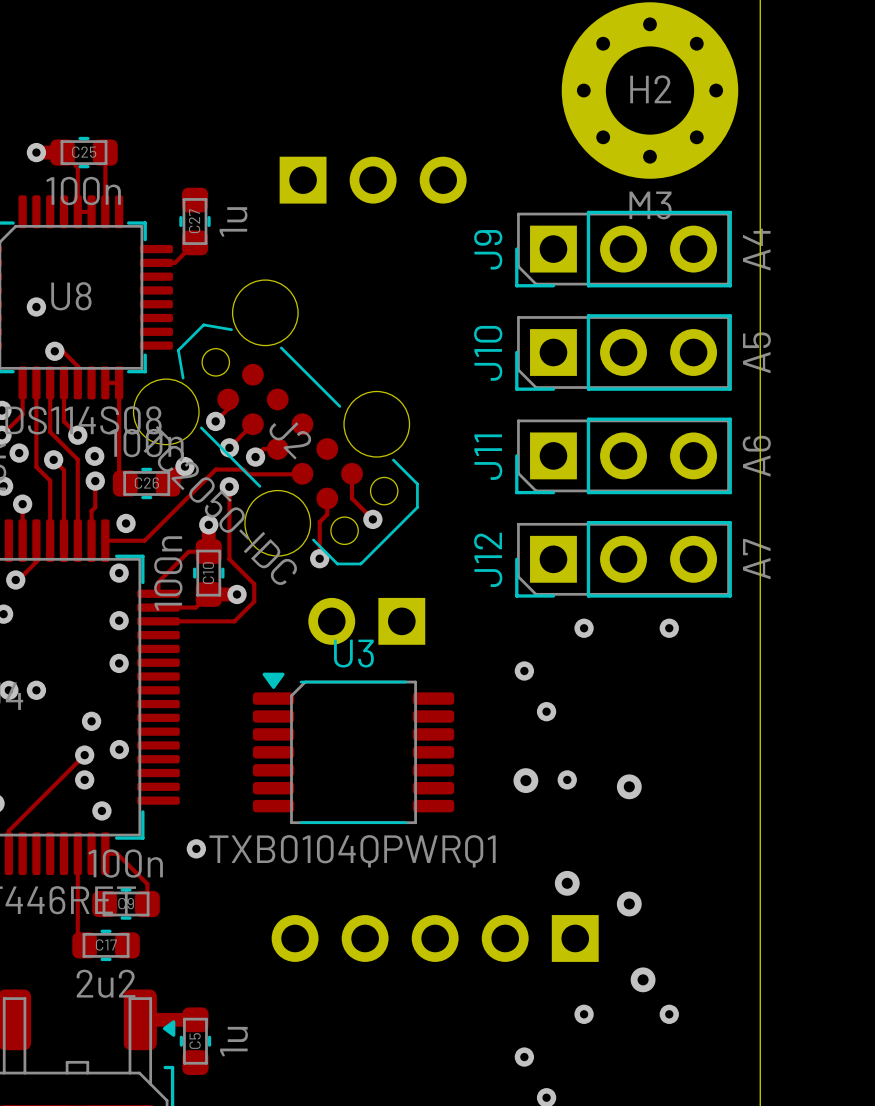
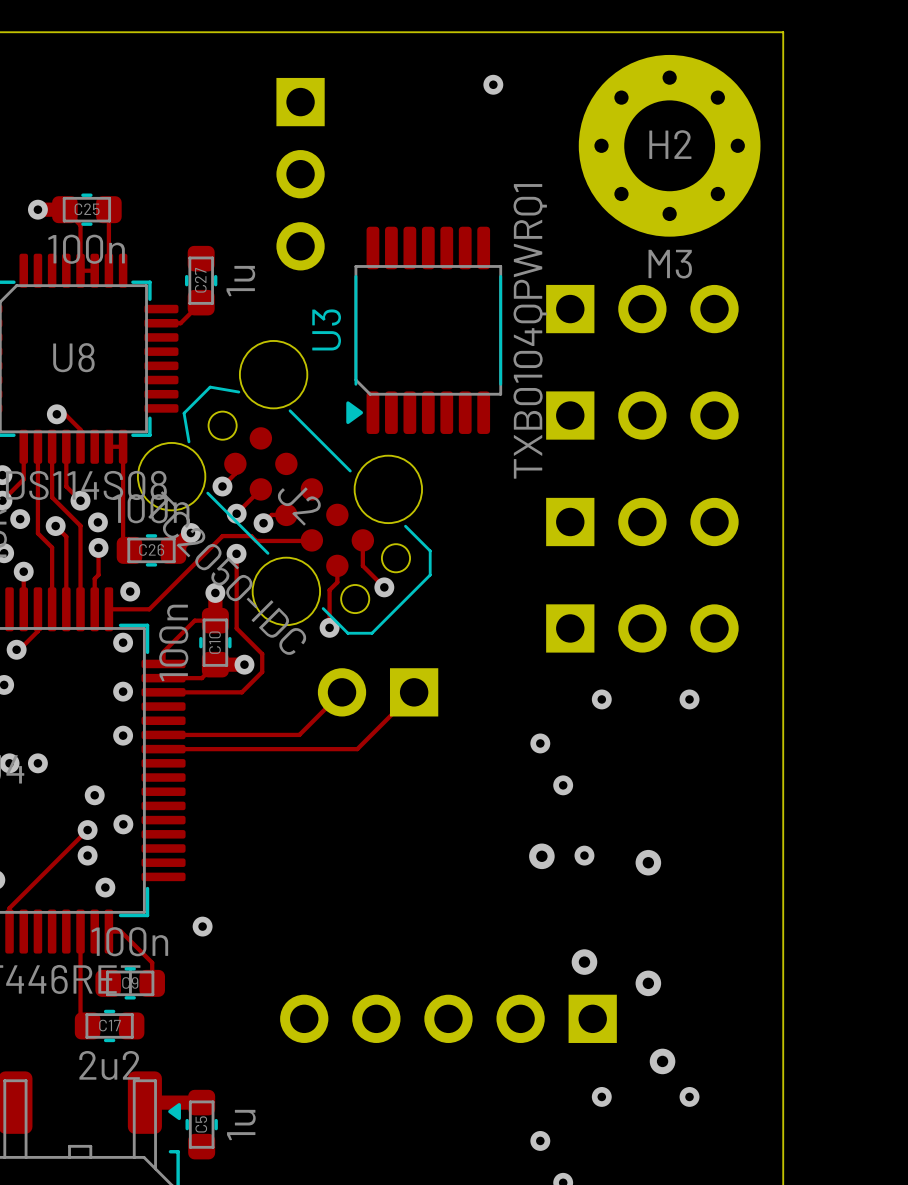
via: none -> (493, 84)
part rotation: 0° (373, 180) -> 90° clockwise (300, 174)
J9 side: top (623, 249) -> bottom (642, 309)
via: (36, 306) -> none
J10 side: top (623, 352) -> bottom (642, 415)
J11 side: top (623, 455) -> bottom (642, 522)
J12 side: top (623, 559) -> bottom (642, 628)
track: none -> (342, 692) (299, 734) (163, 734)
track: none -> (414, 692) (357, 749) (163, 749)
U3 rotation: 0° (353, 748) -> 90° counterclockwise (424, 330)
U3 position: (353, 748) -> (424, 330)

